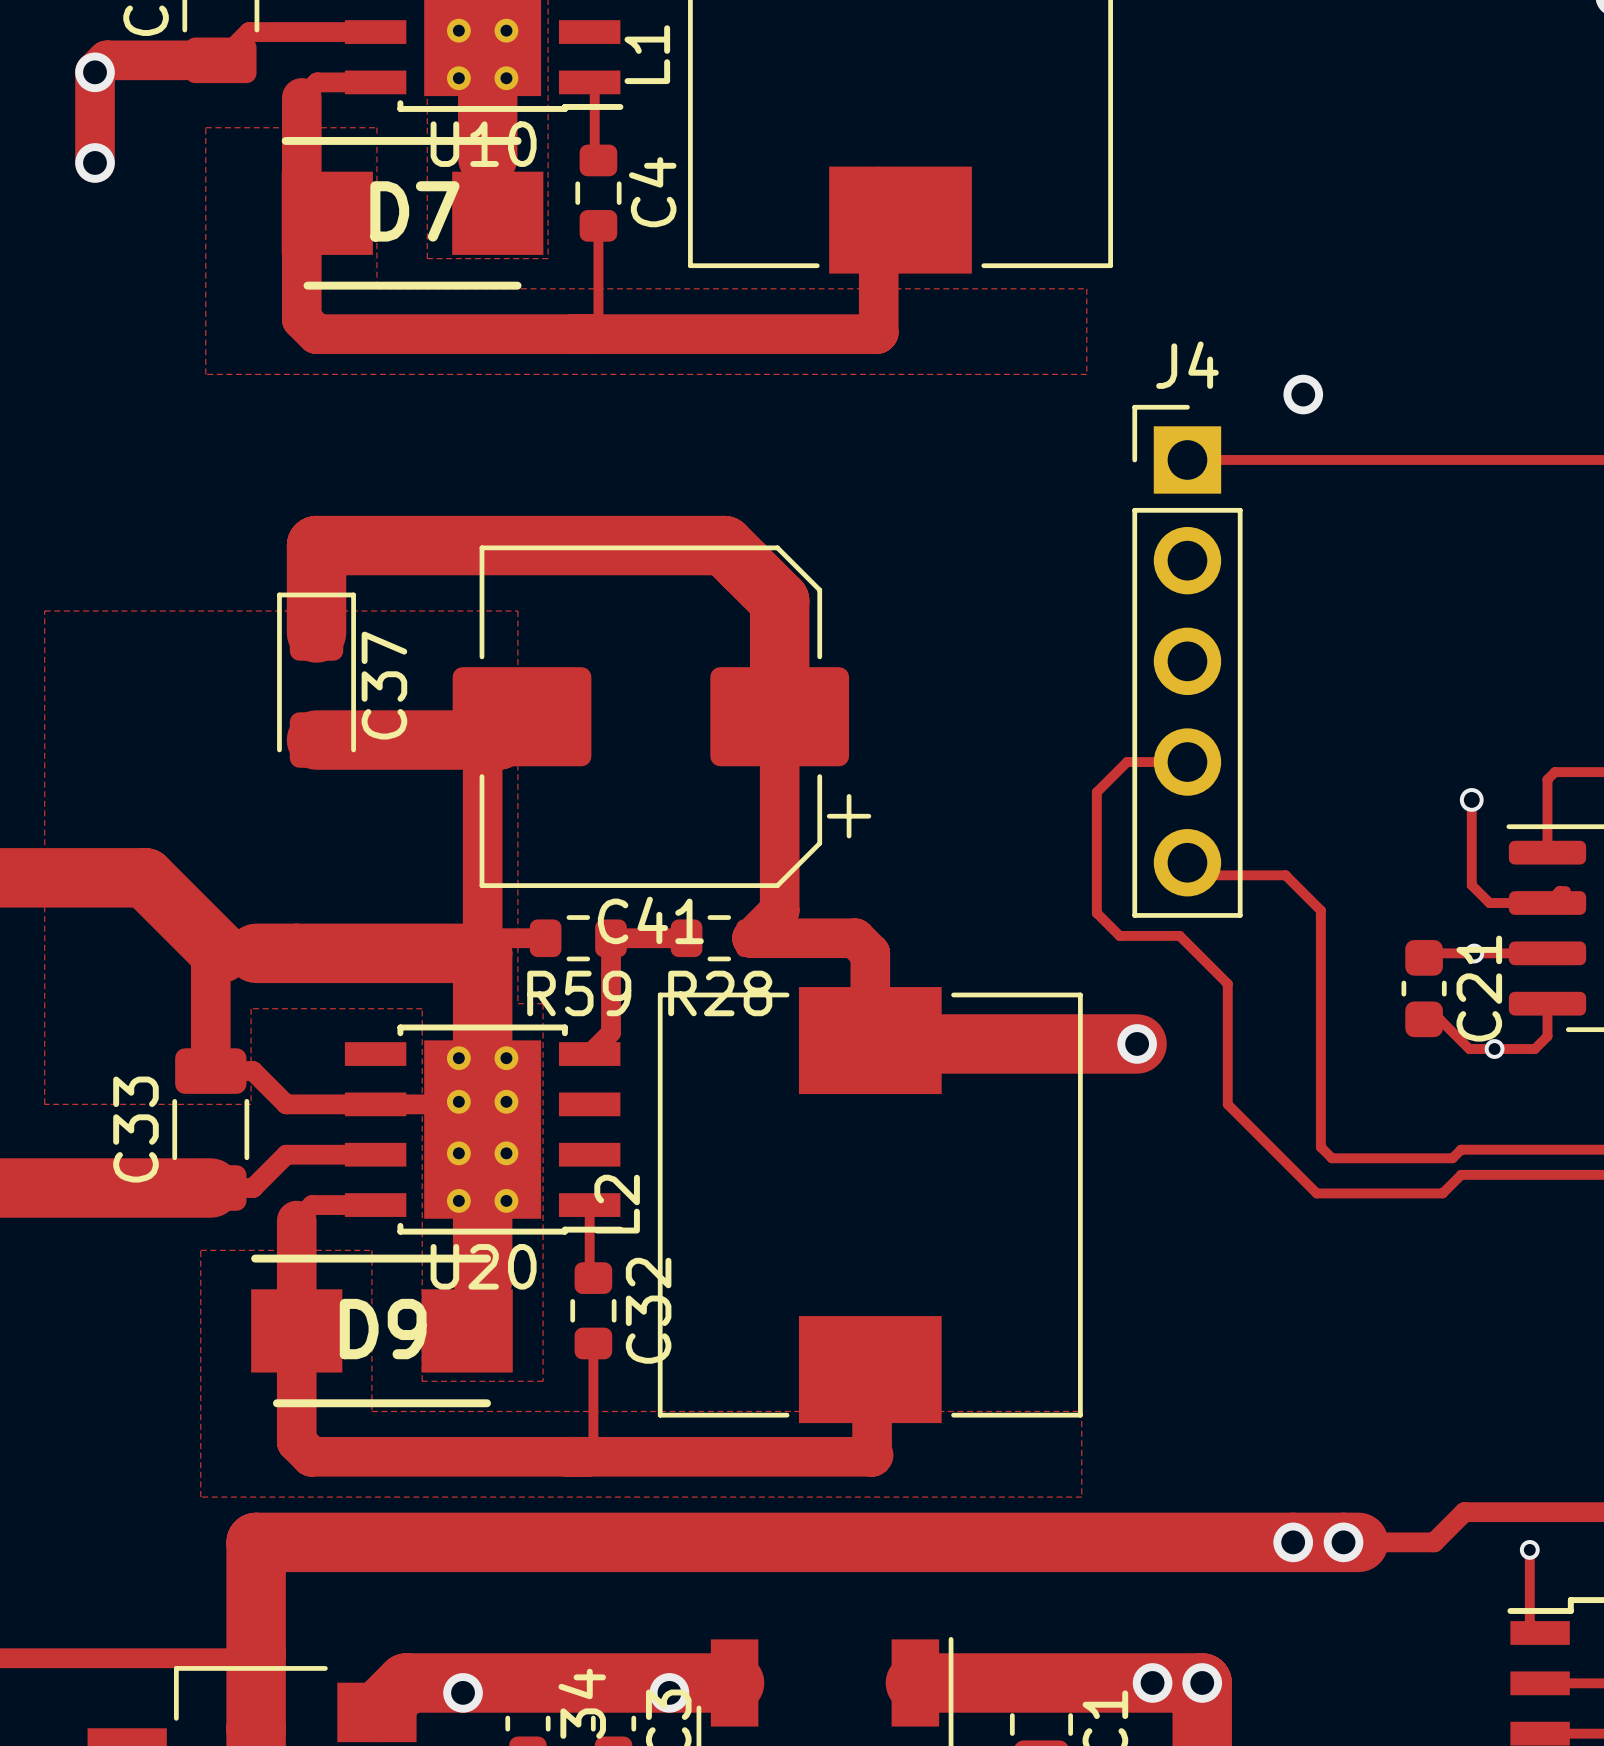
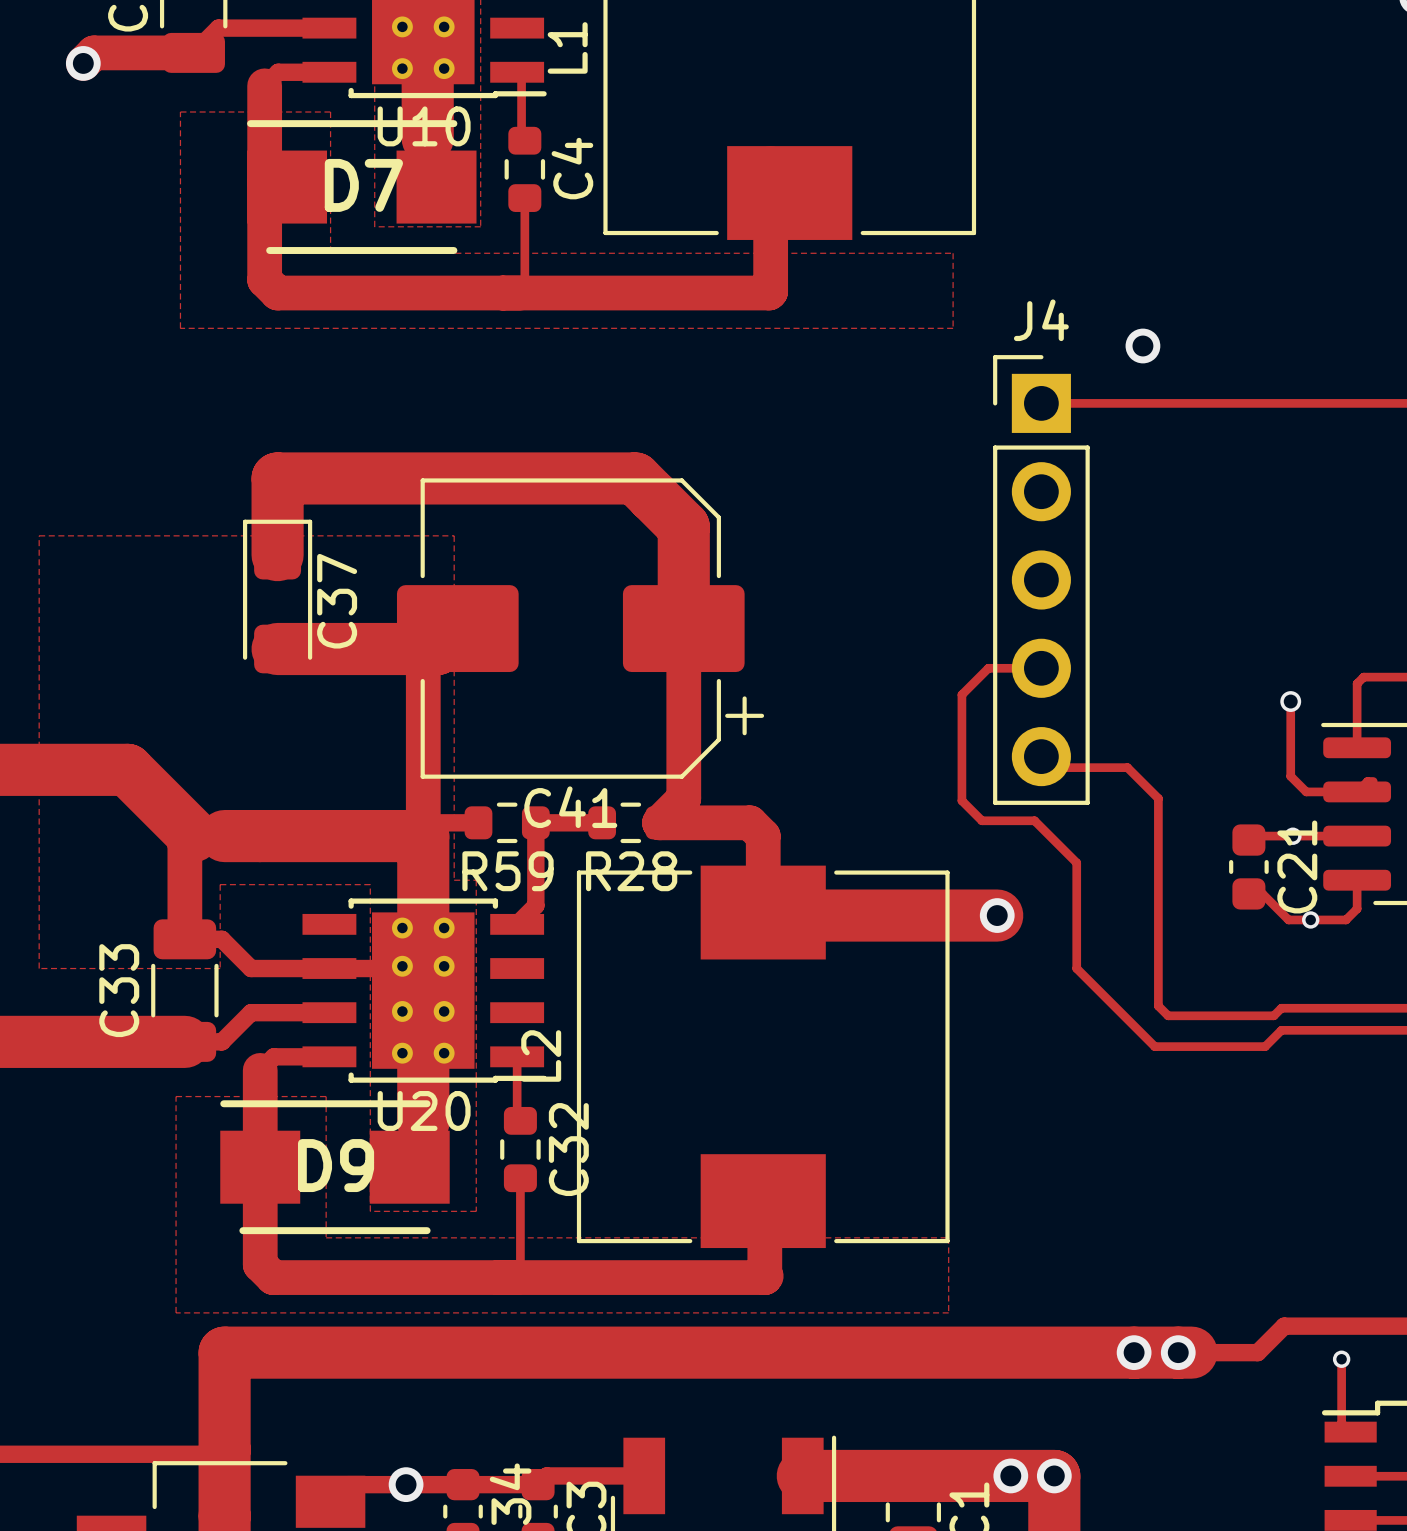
track: (95, 72) (95, 162) -> none
via: (95, 162) -> none
track: (734, 1682) (406, 1682) (376, 1712) -> none
via: (669, 1692) -> none

